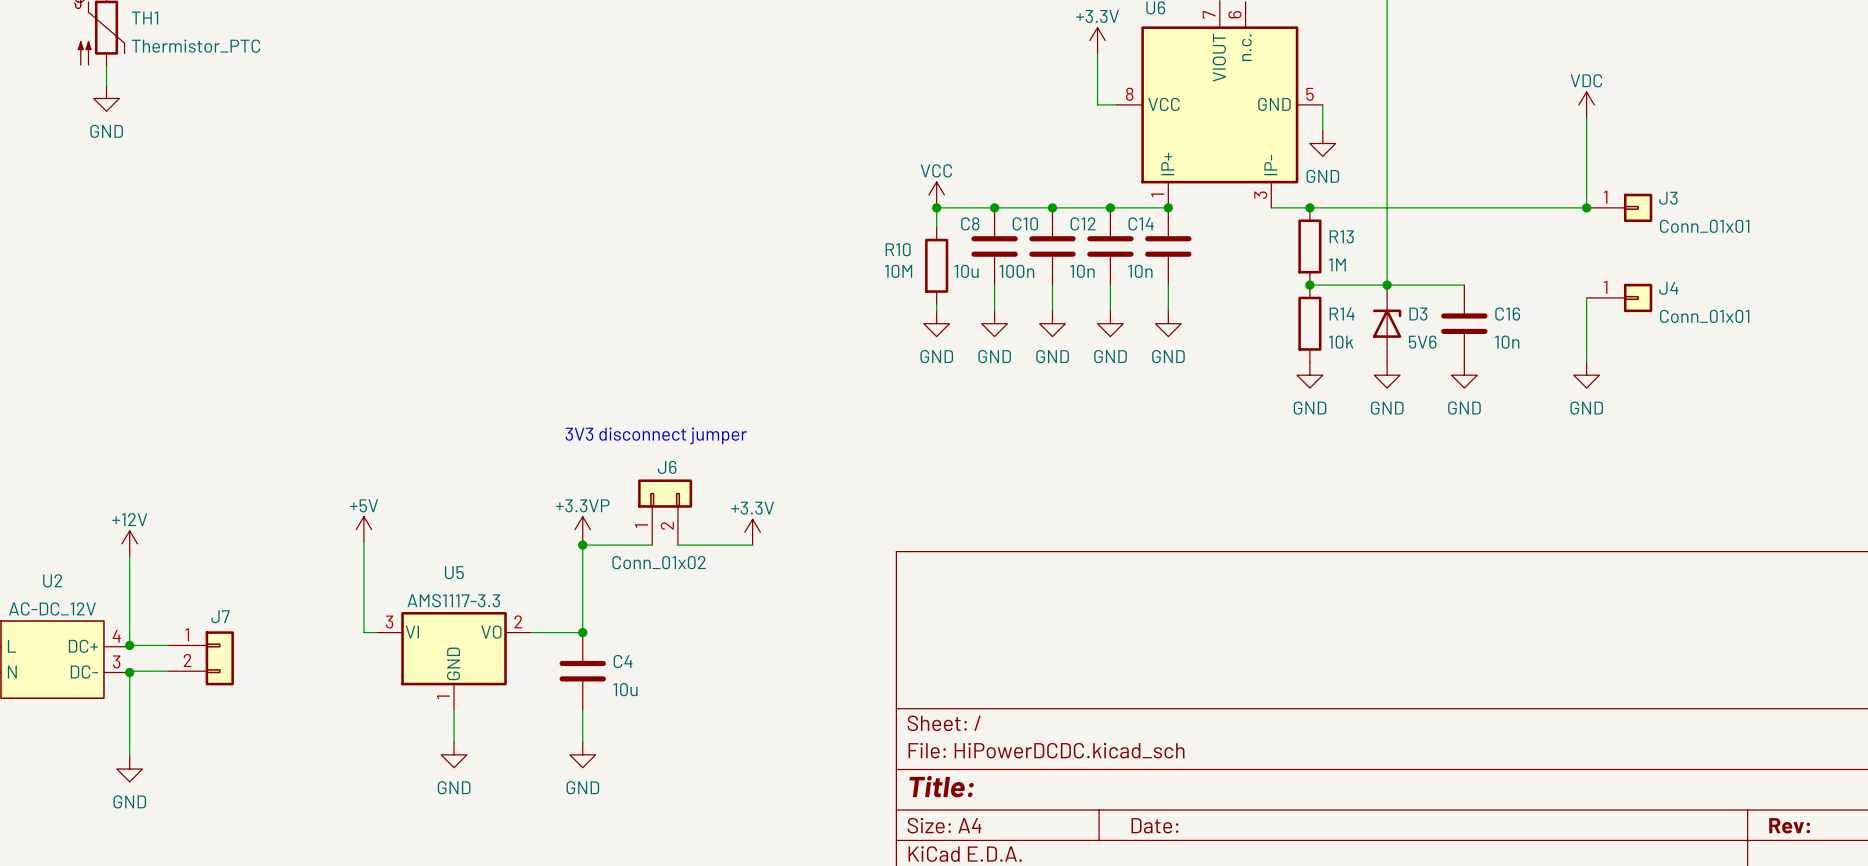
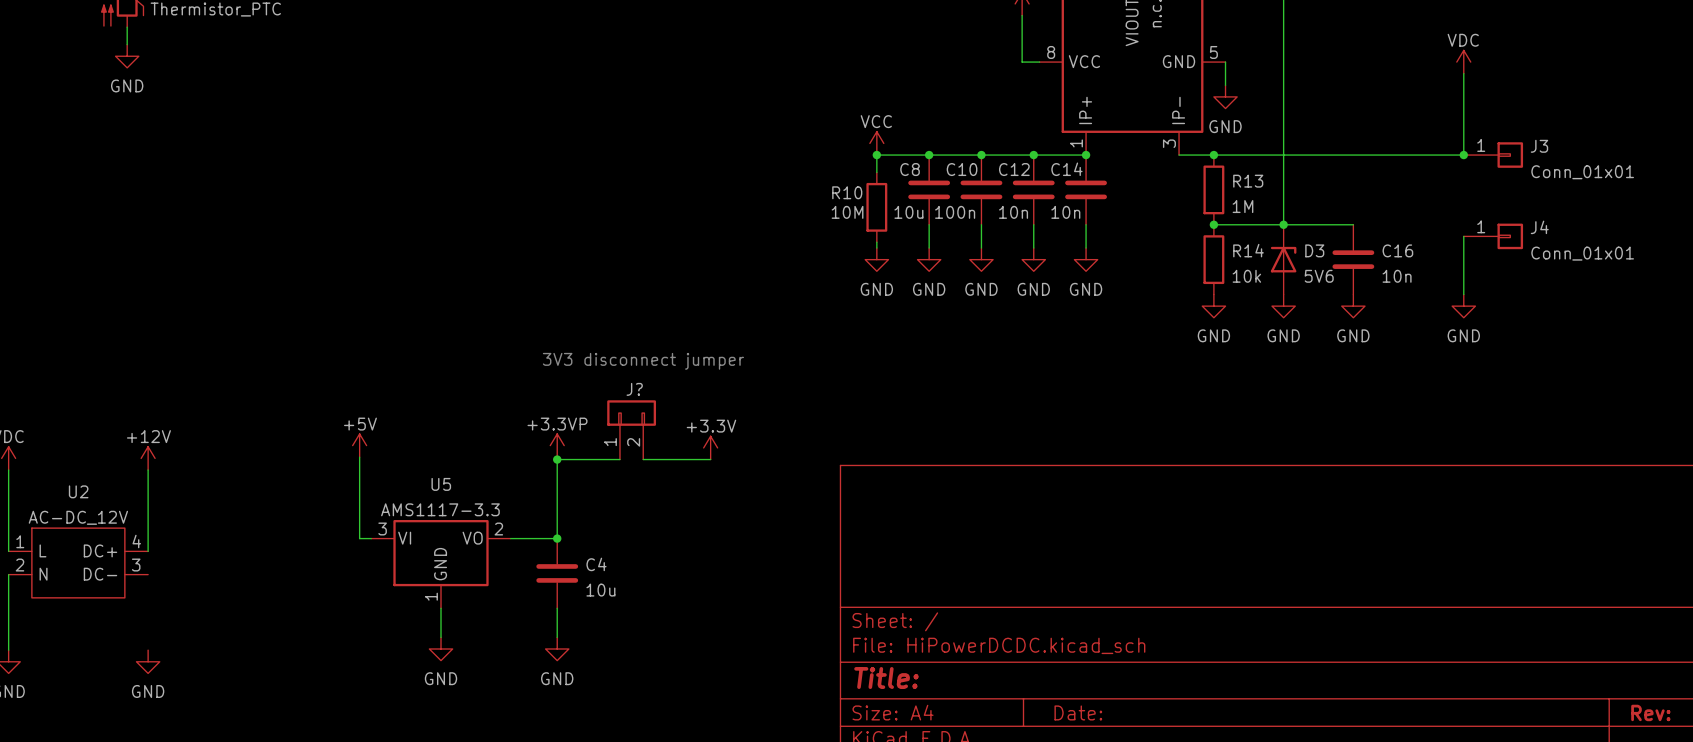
J6 name: J6 (667, 467) -> J? (634, 389)
J6 value: Conn_01x02 (659, 562) -> none
wire: (129, 645) (168, 645) -> none
junction: (129, 645) -> none
J7: (201, 658) -> none
wire: (168, 671) (129, 671) (129, 756) -> none
junction: (129, 672) -> none

